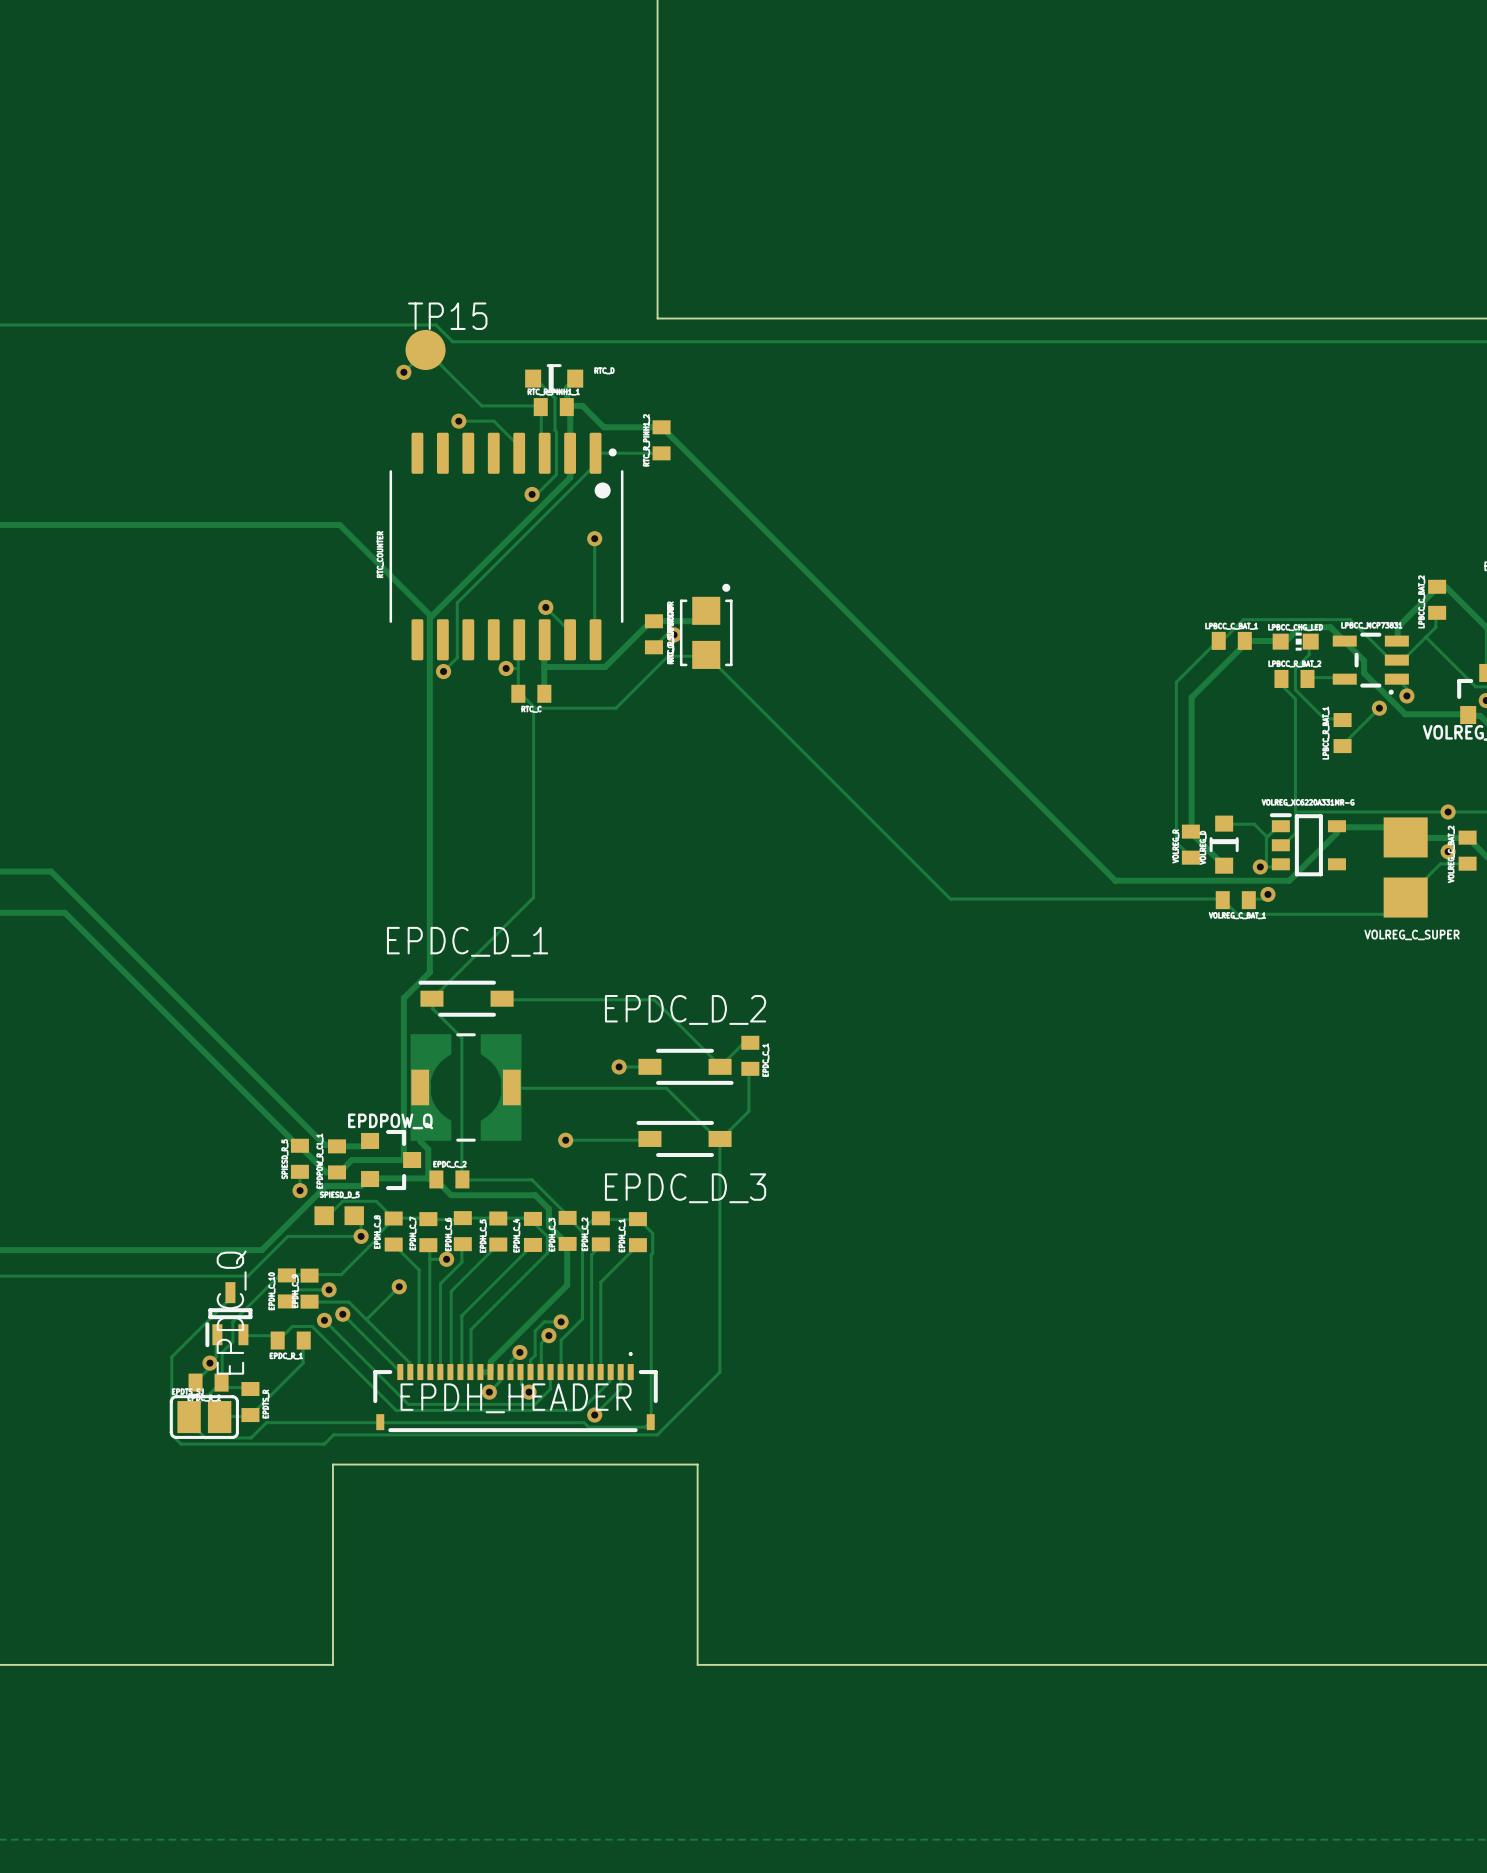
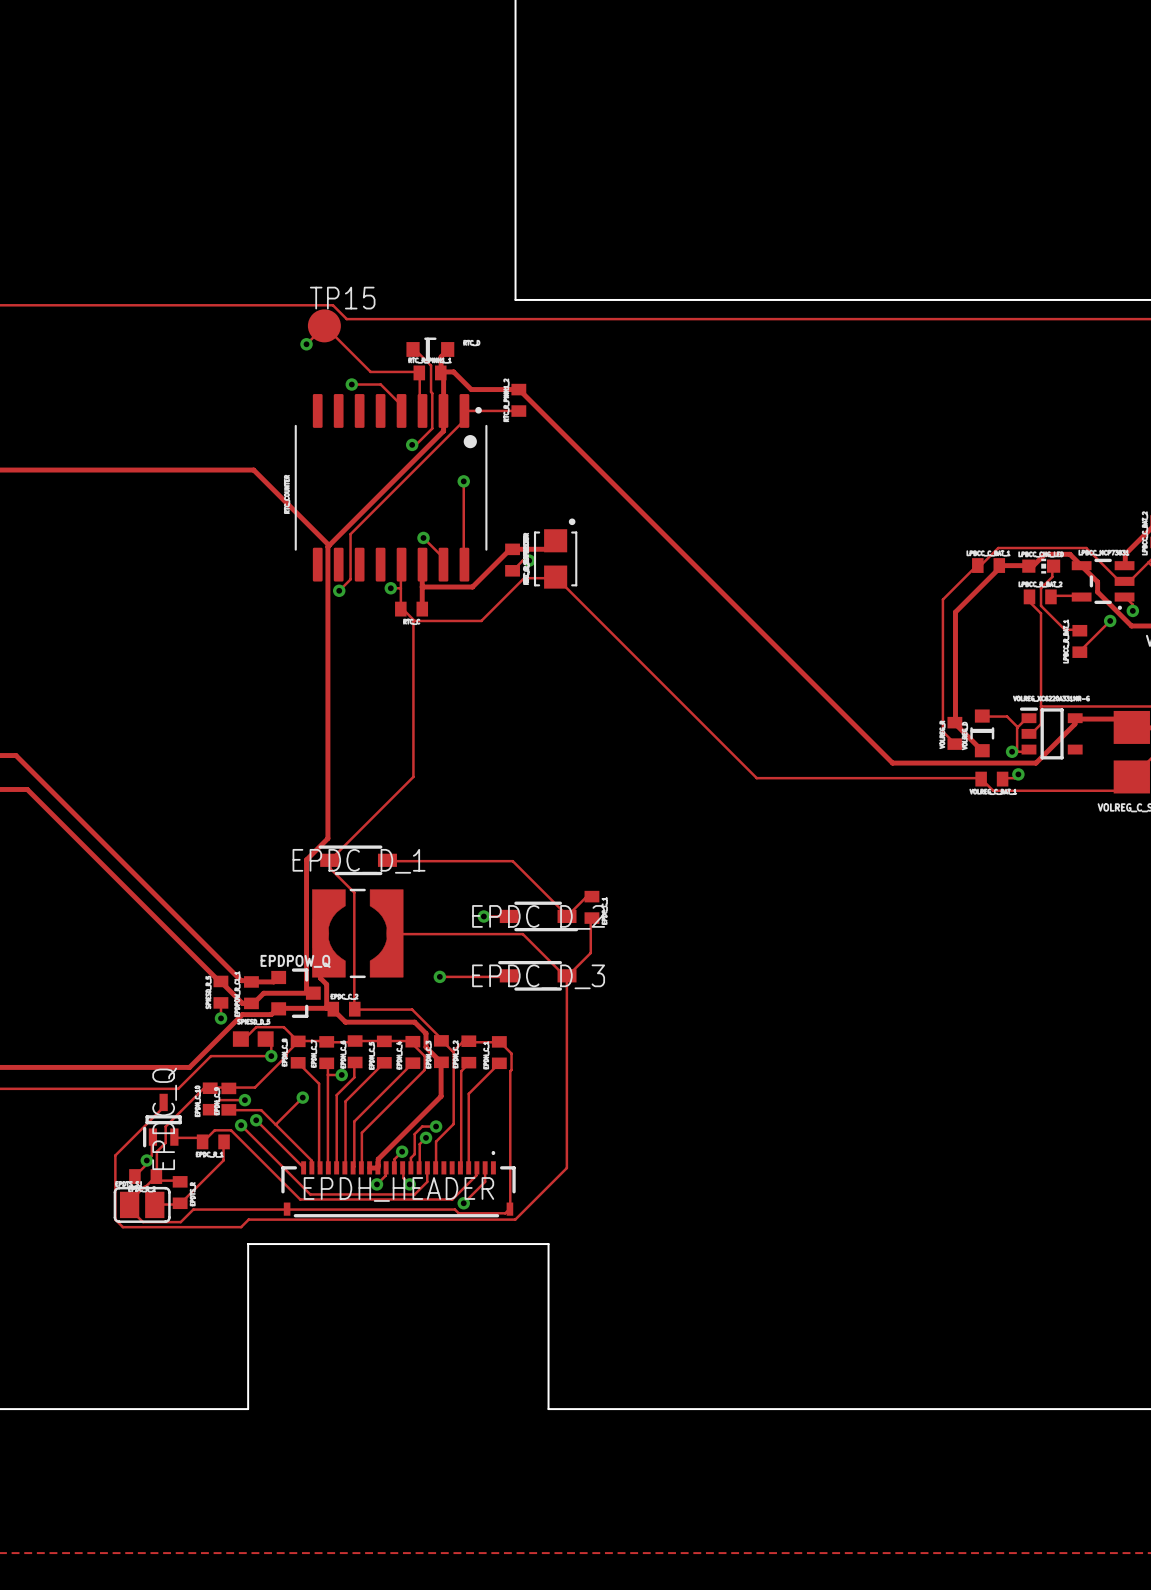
EPDC_D_1 name position: EPDC_D_1 (467, 941) -> EPDC_D_1 (359, 861)
EPDC_D_2 name position: EPDC_D_2 (685, 1009) -> EPDC_D_2 (538, 917)
EPDC_D_3 name position: EPDC_D_3 (685, 1188) -> EPDC_D_3 (538, 976)

